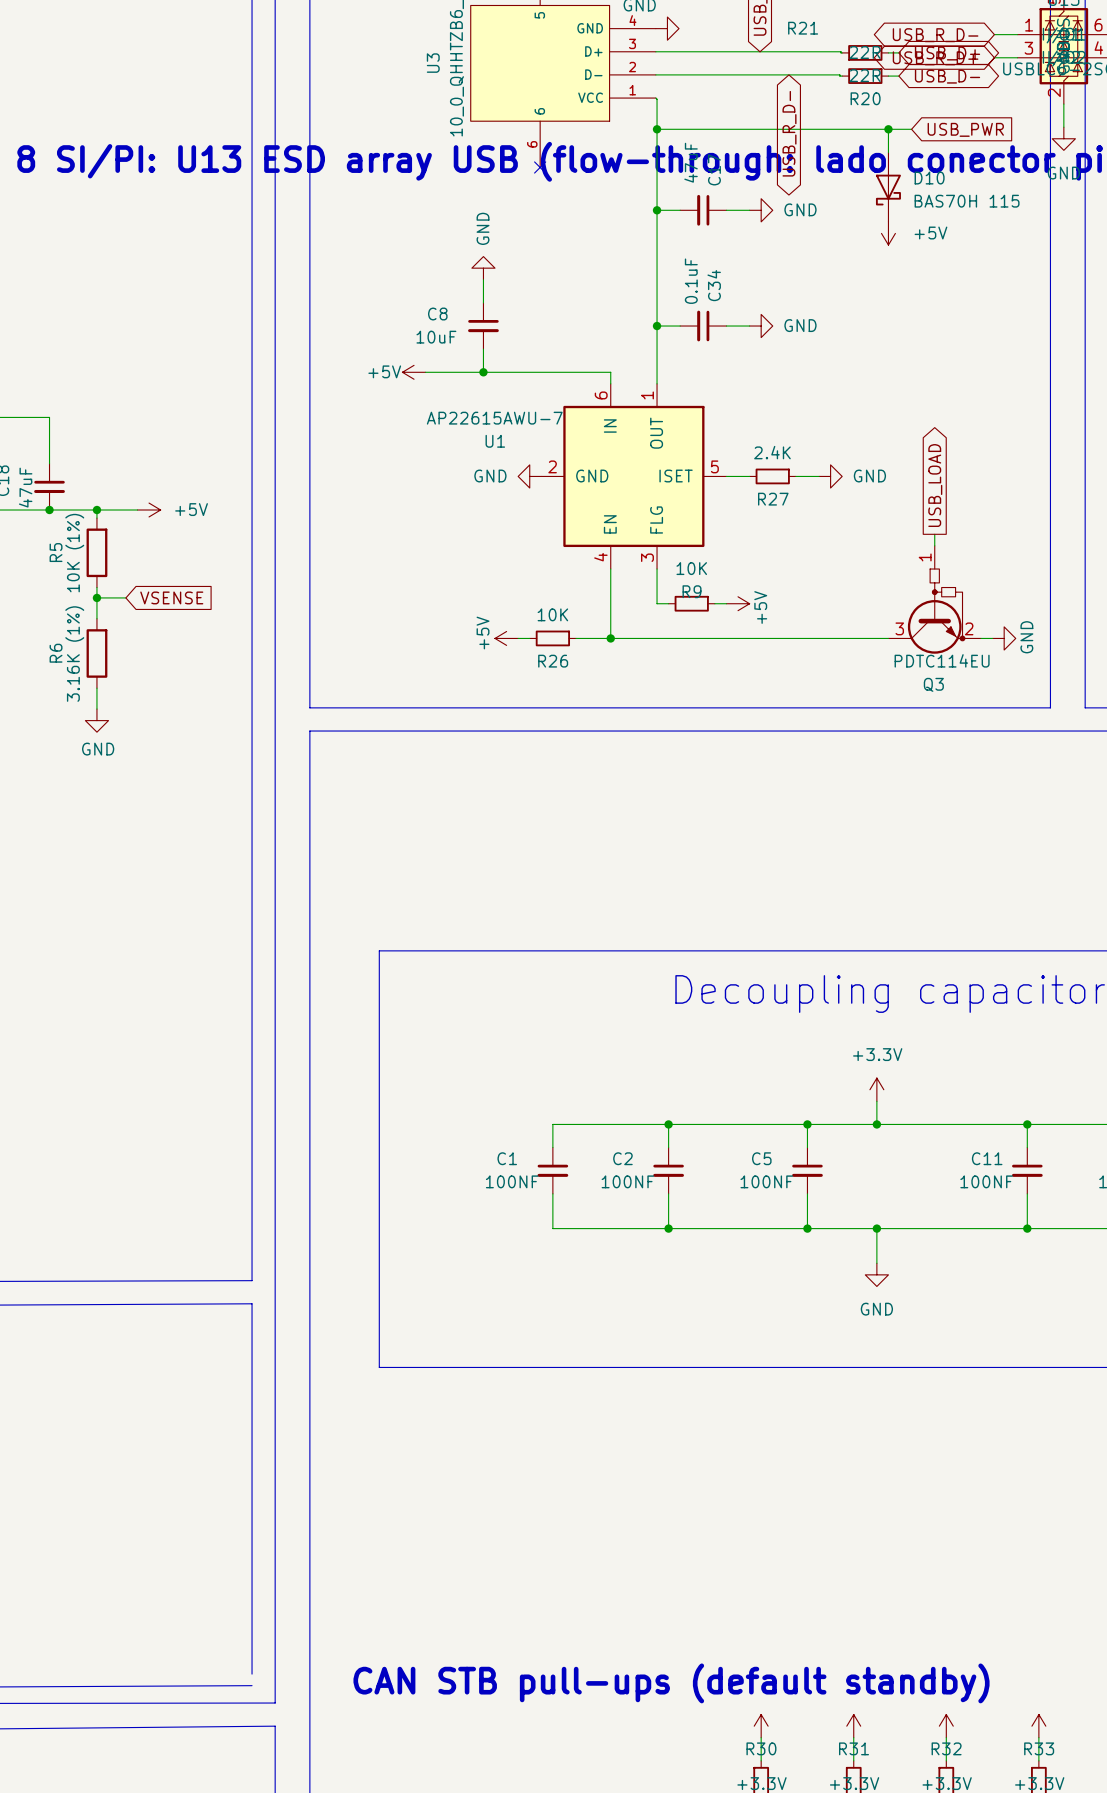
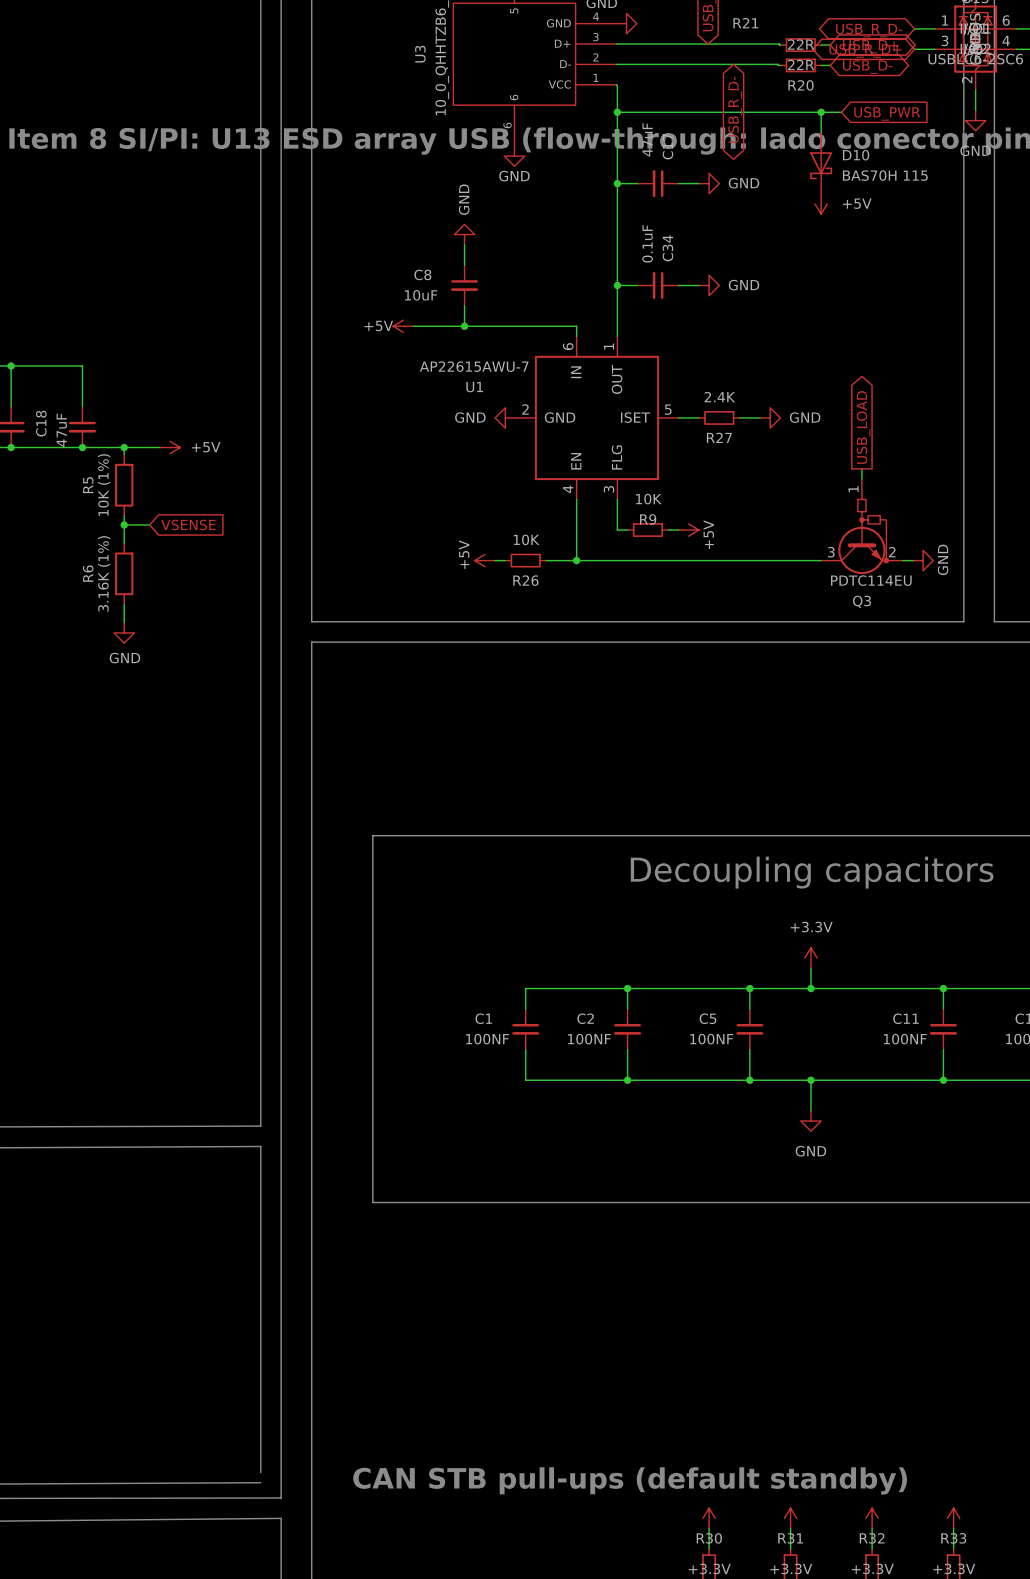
no-connect mark: (540, 167) -> none
power symbol: none -> GND (514, 156)

